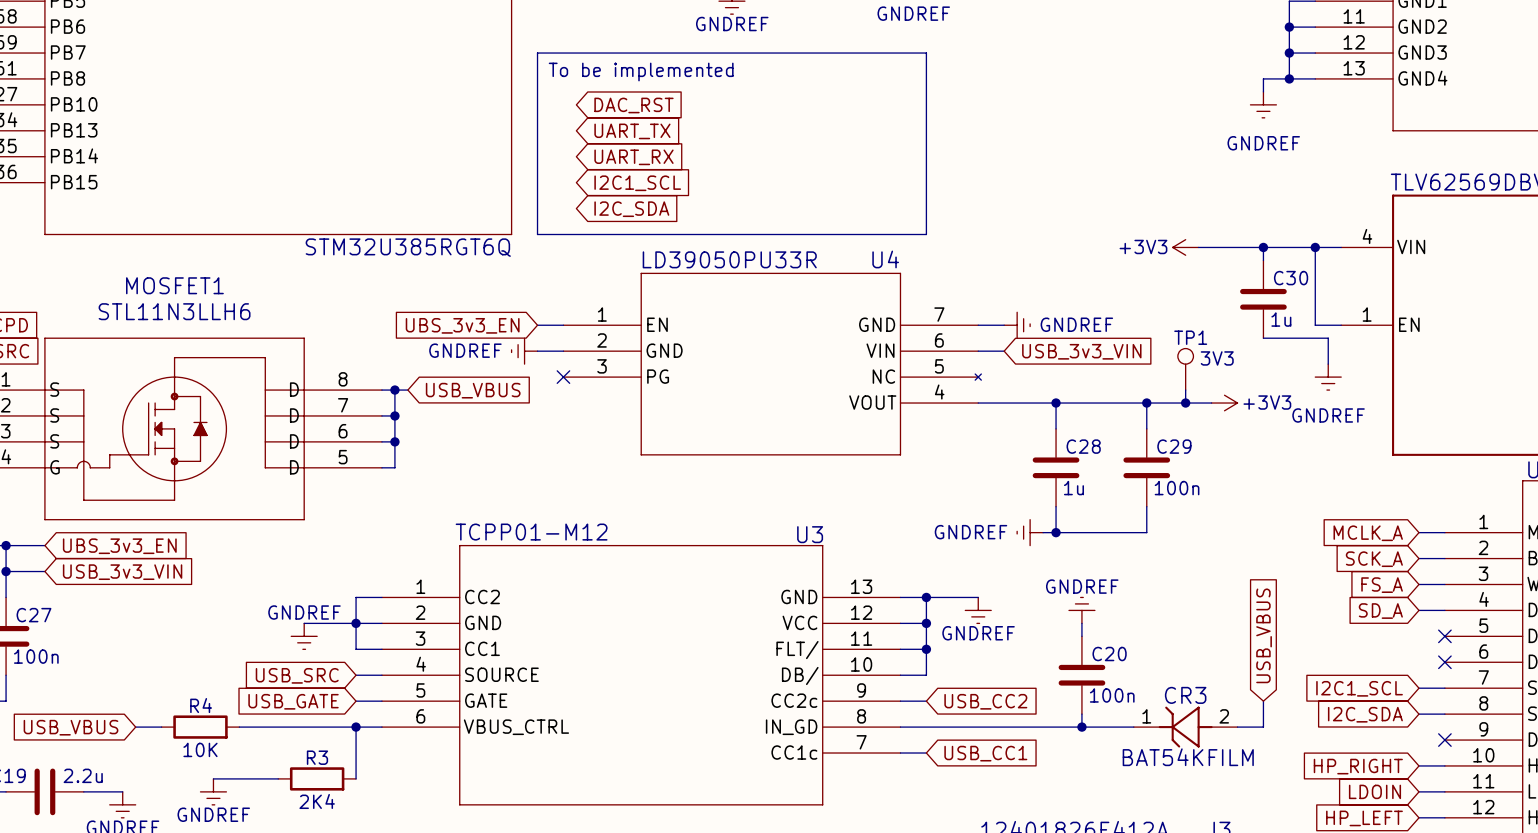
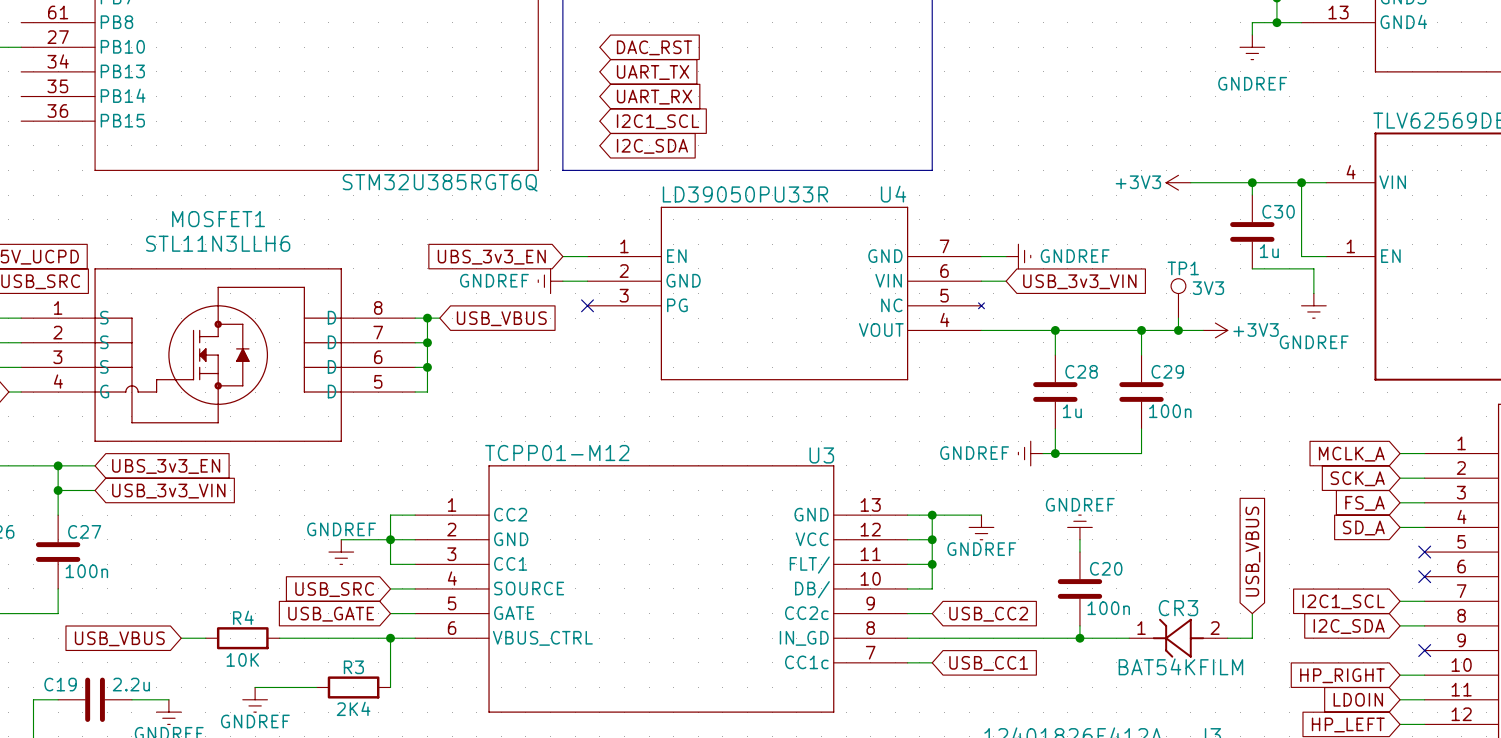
text: To be implemented (641, 72) -> none

